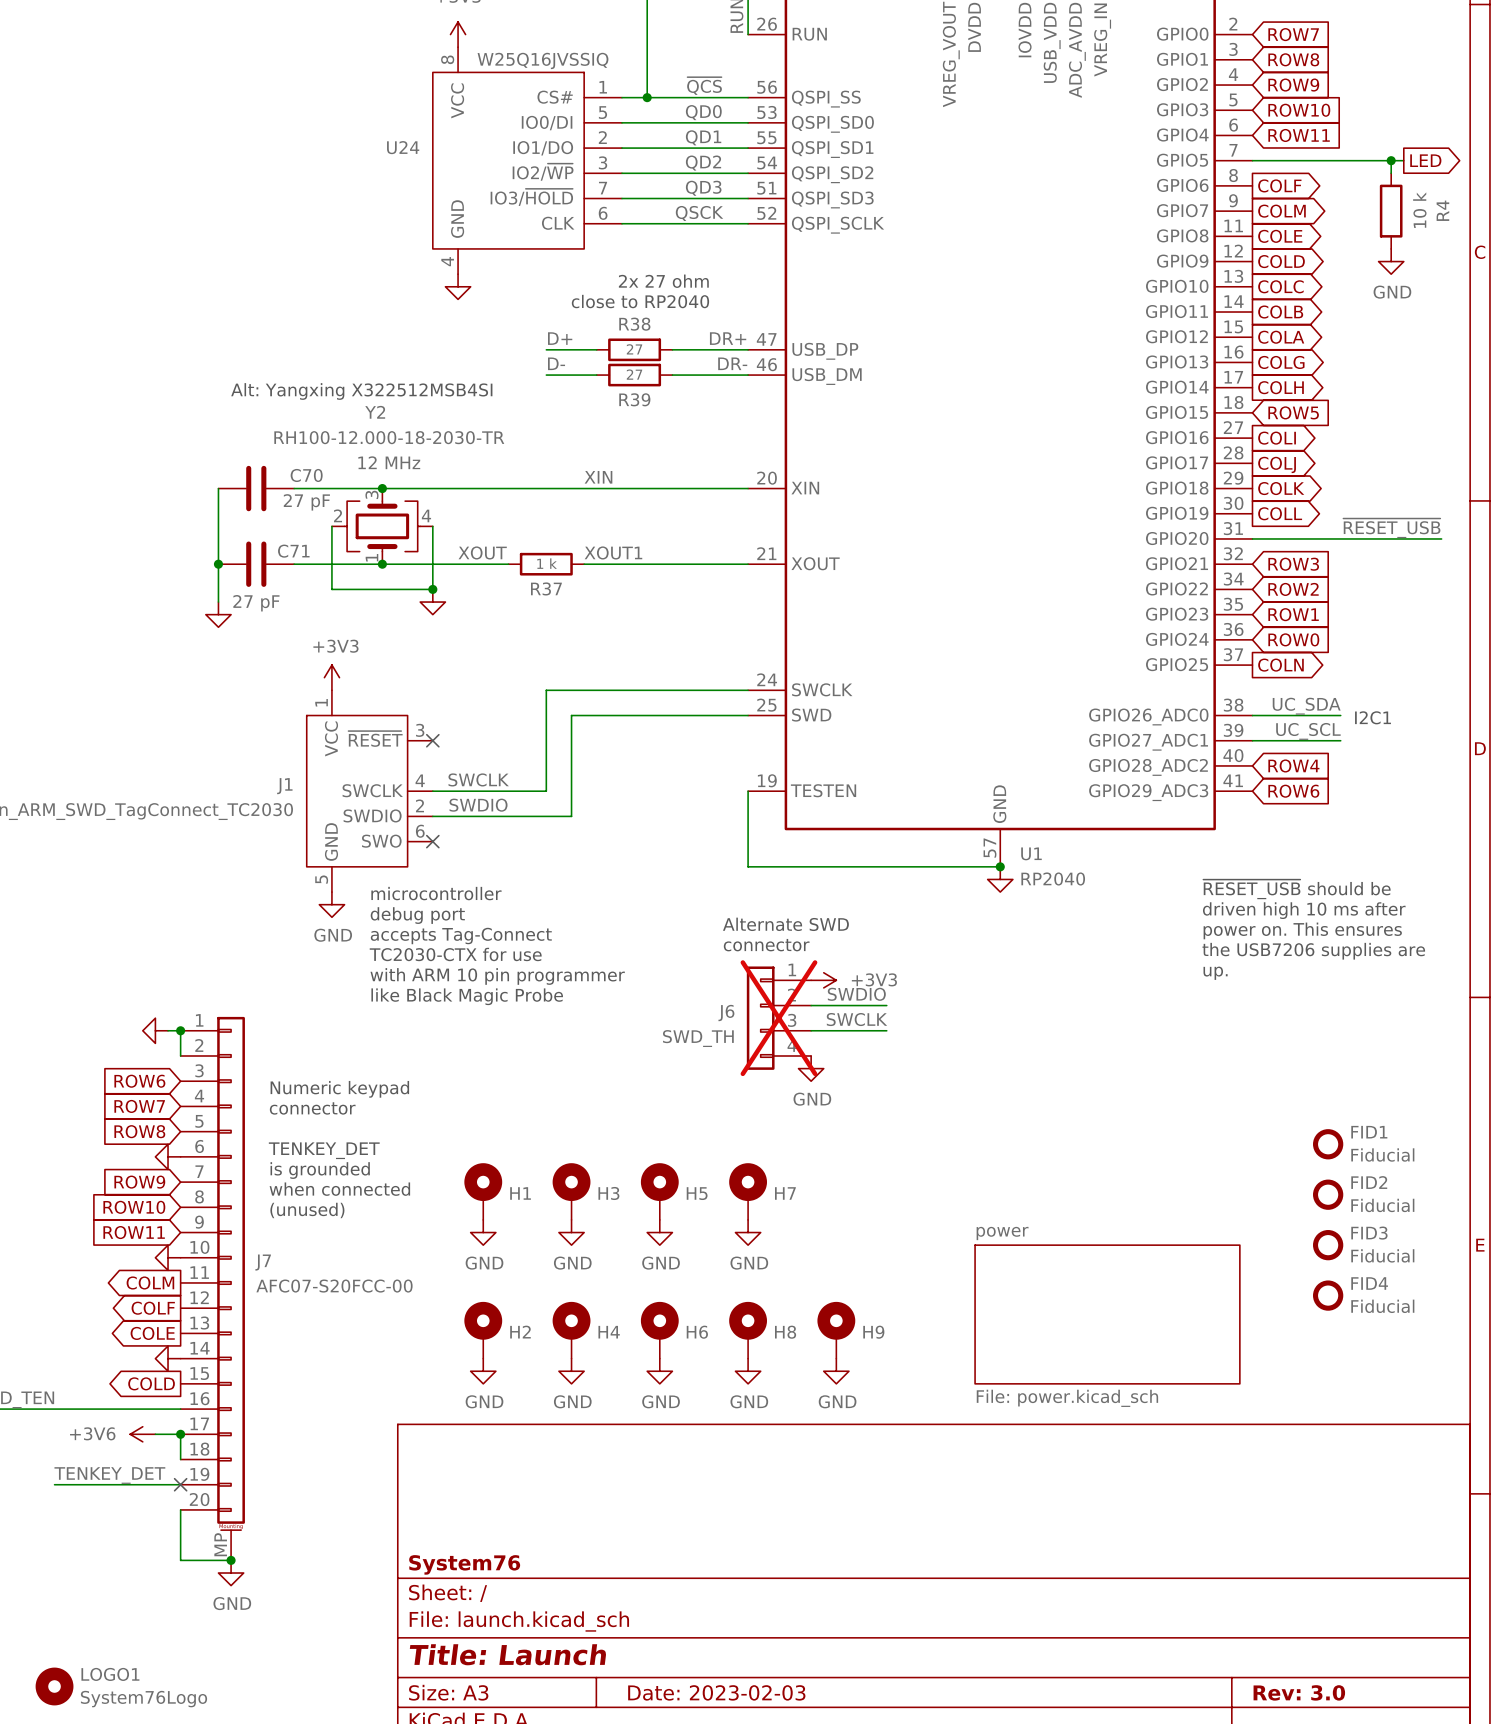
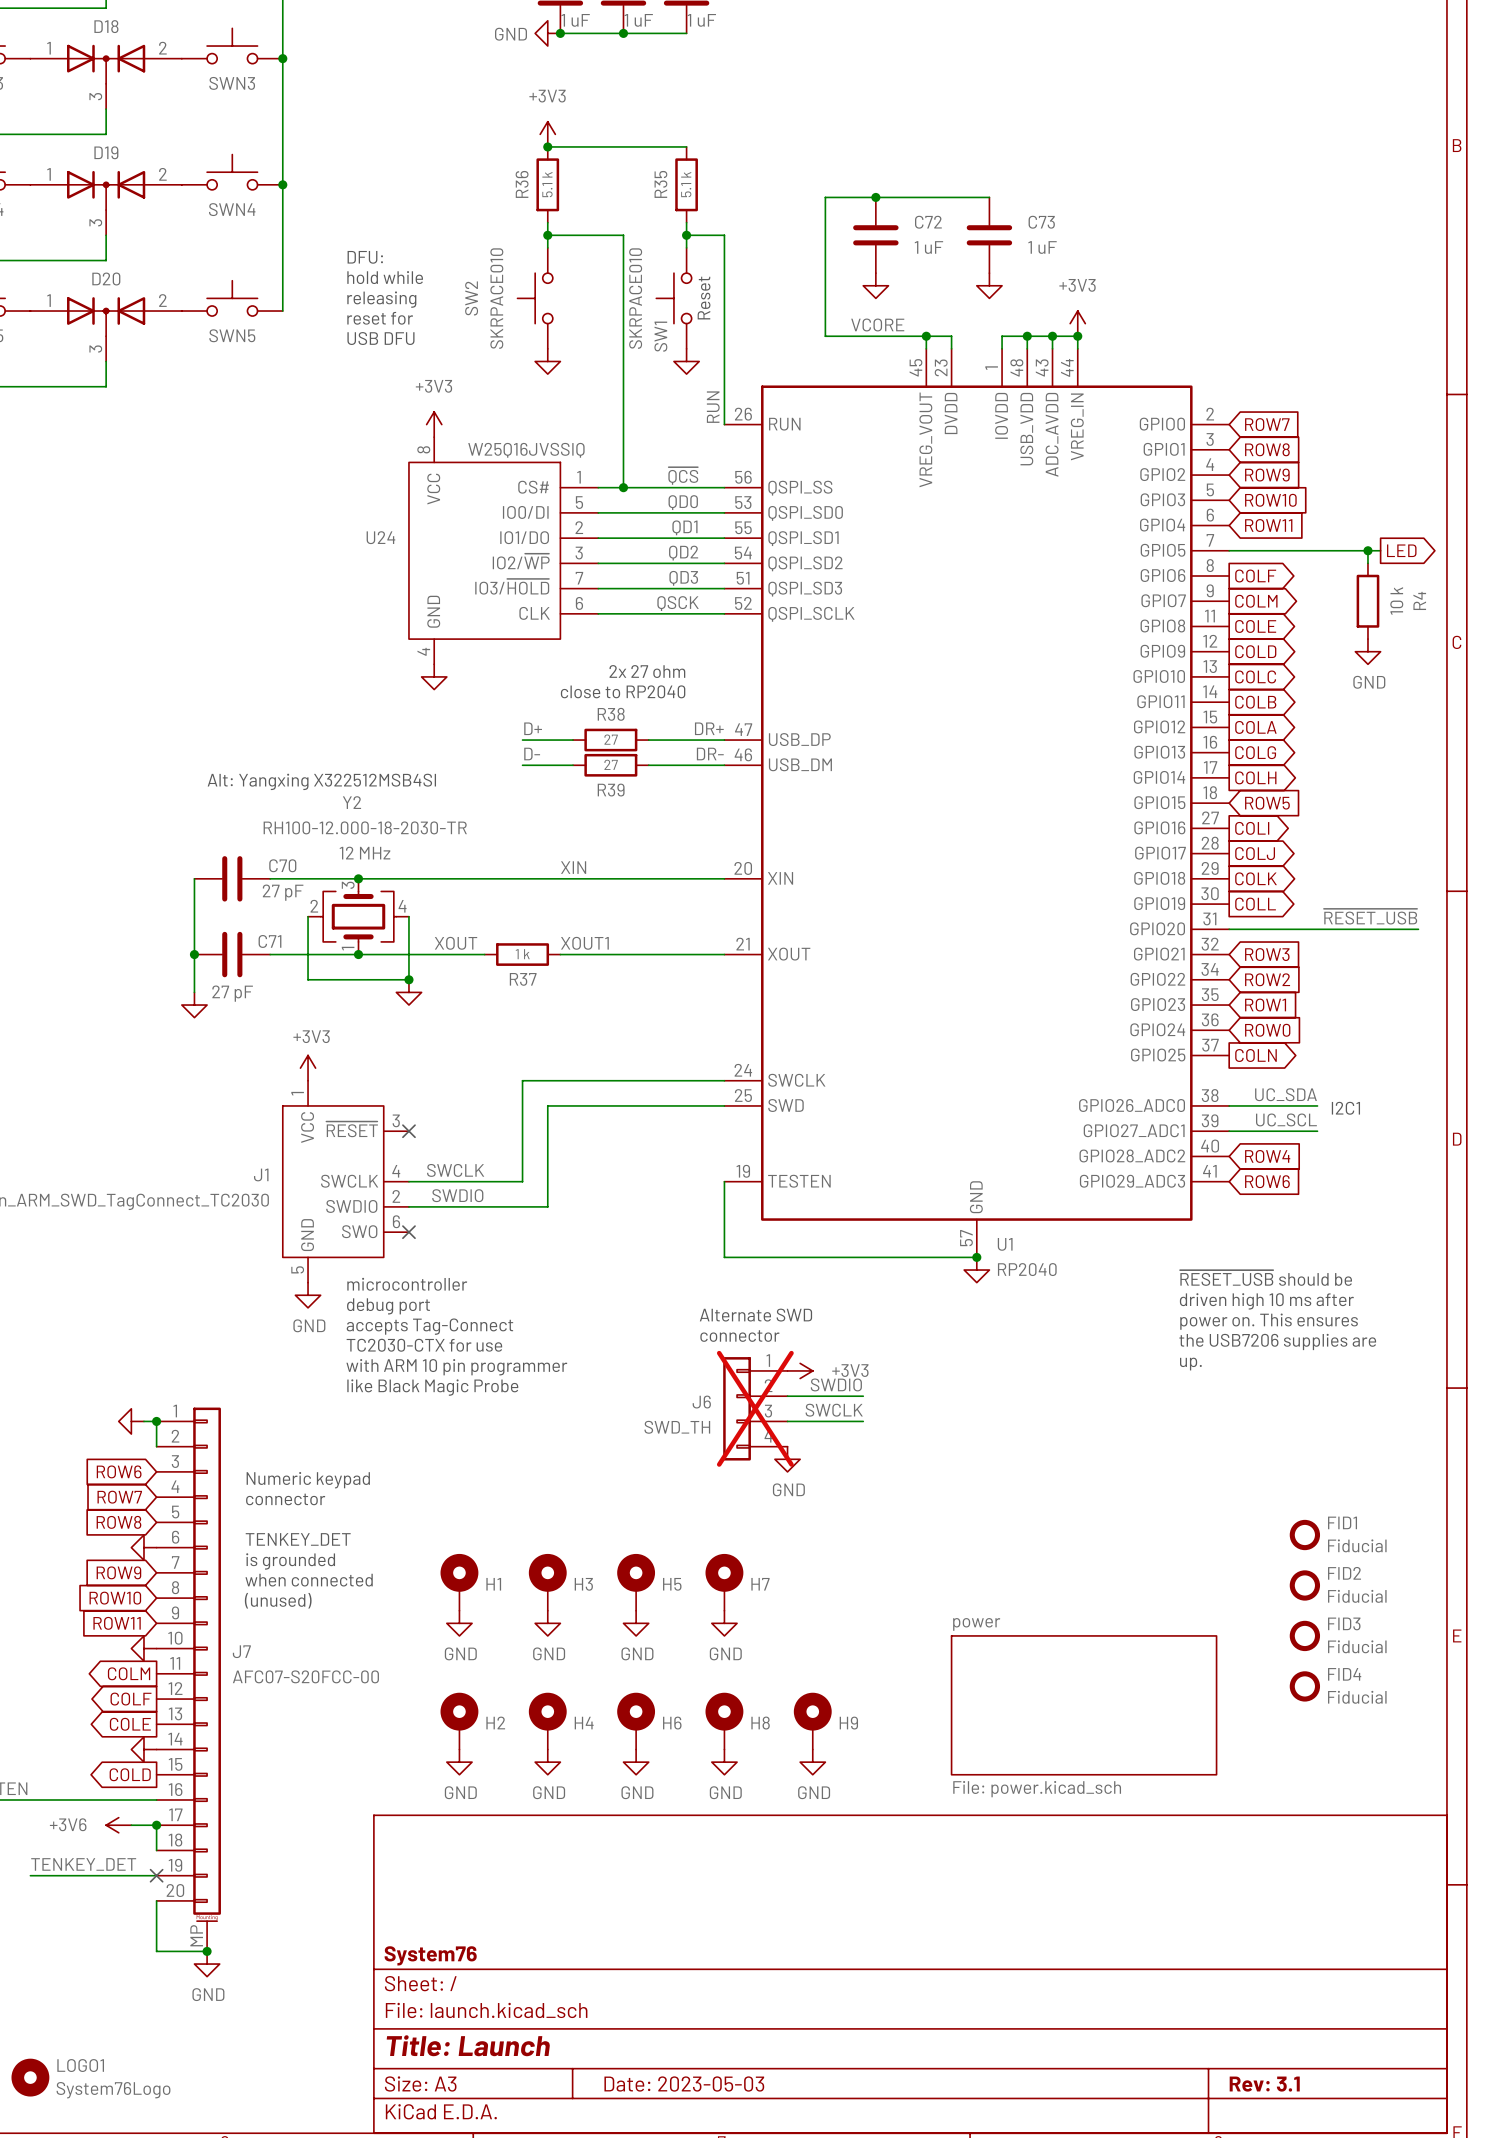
title block: Date: 2023-02-03 (716, 1692) -> Date: 2023-05-03 (684, 2084)
title block: Rev: 3.0 (1299, 1692) -> Rev: 3.1 (1264, 2084)

